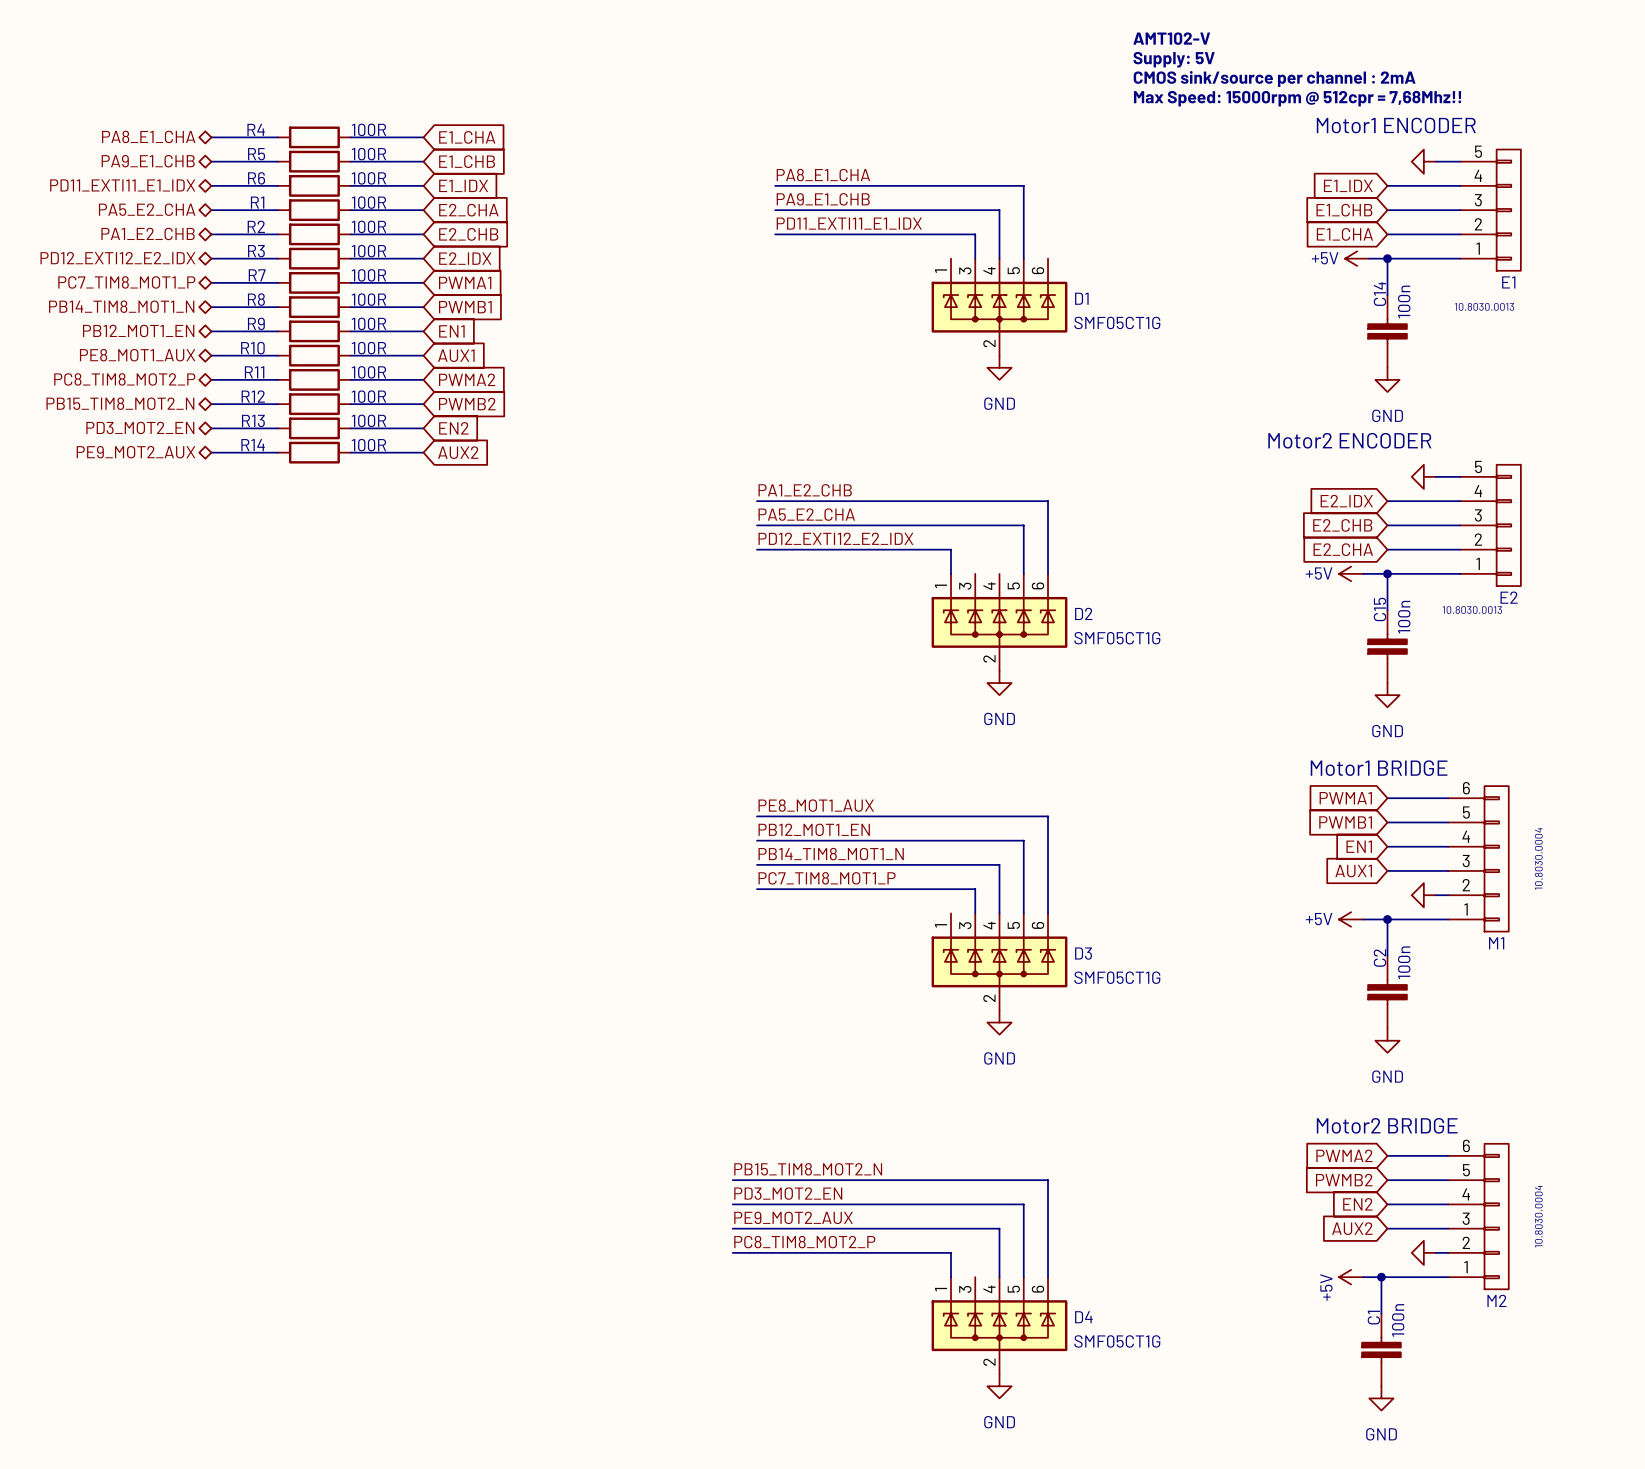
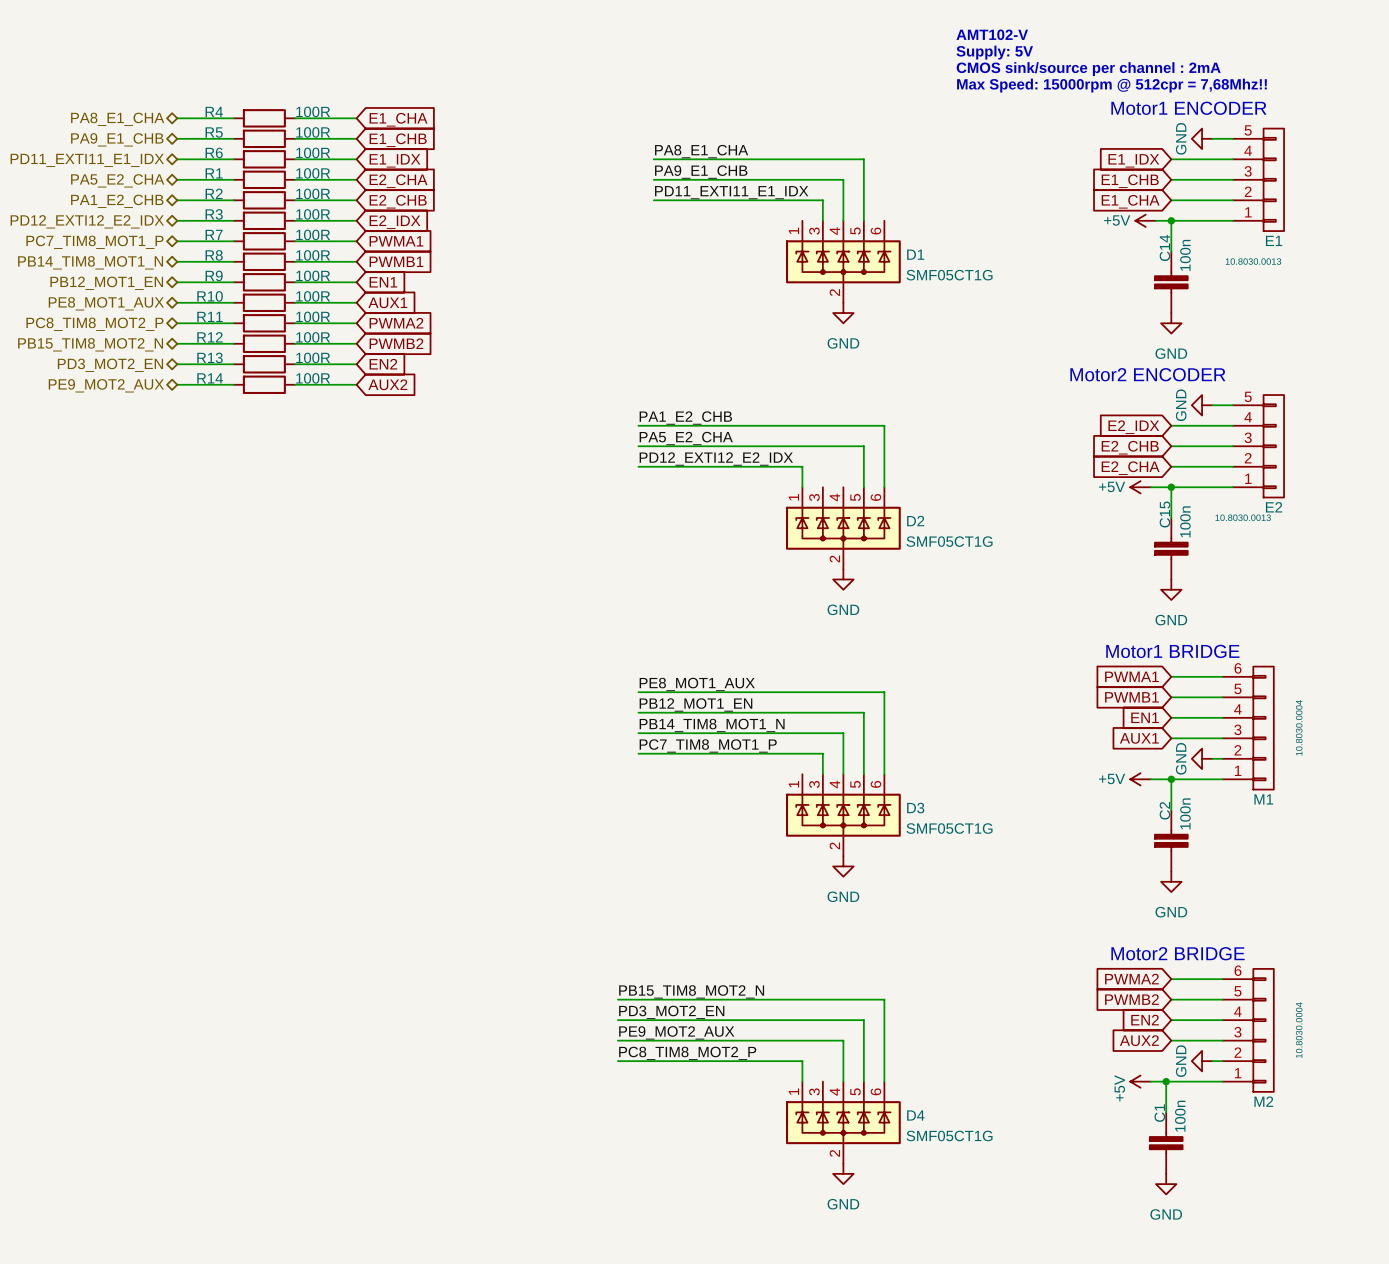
power symbol text: none -> GND (1181, 138)
power symbol text: none -> GND (1181, 405)
power symbol text: none -> GND (1181, 758)
power symbol text: none -> GND (1181, 1061)

